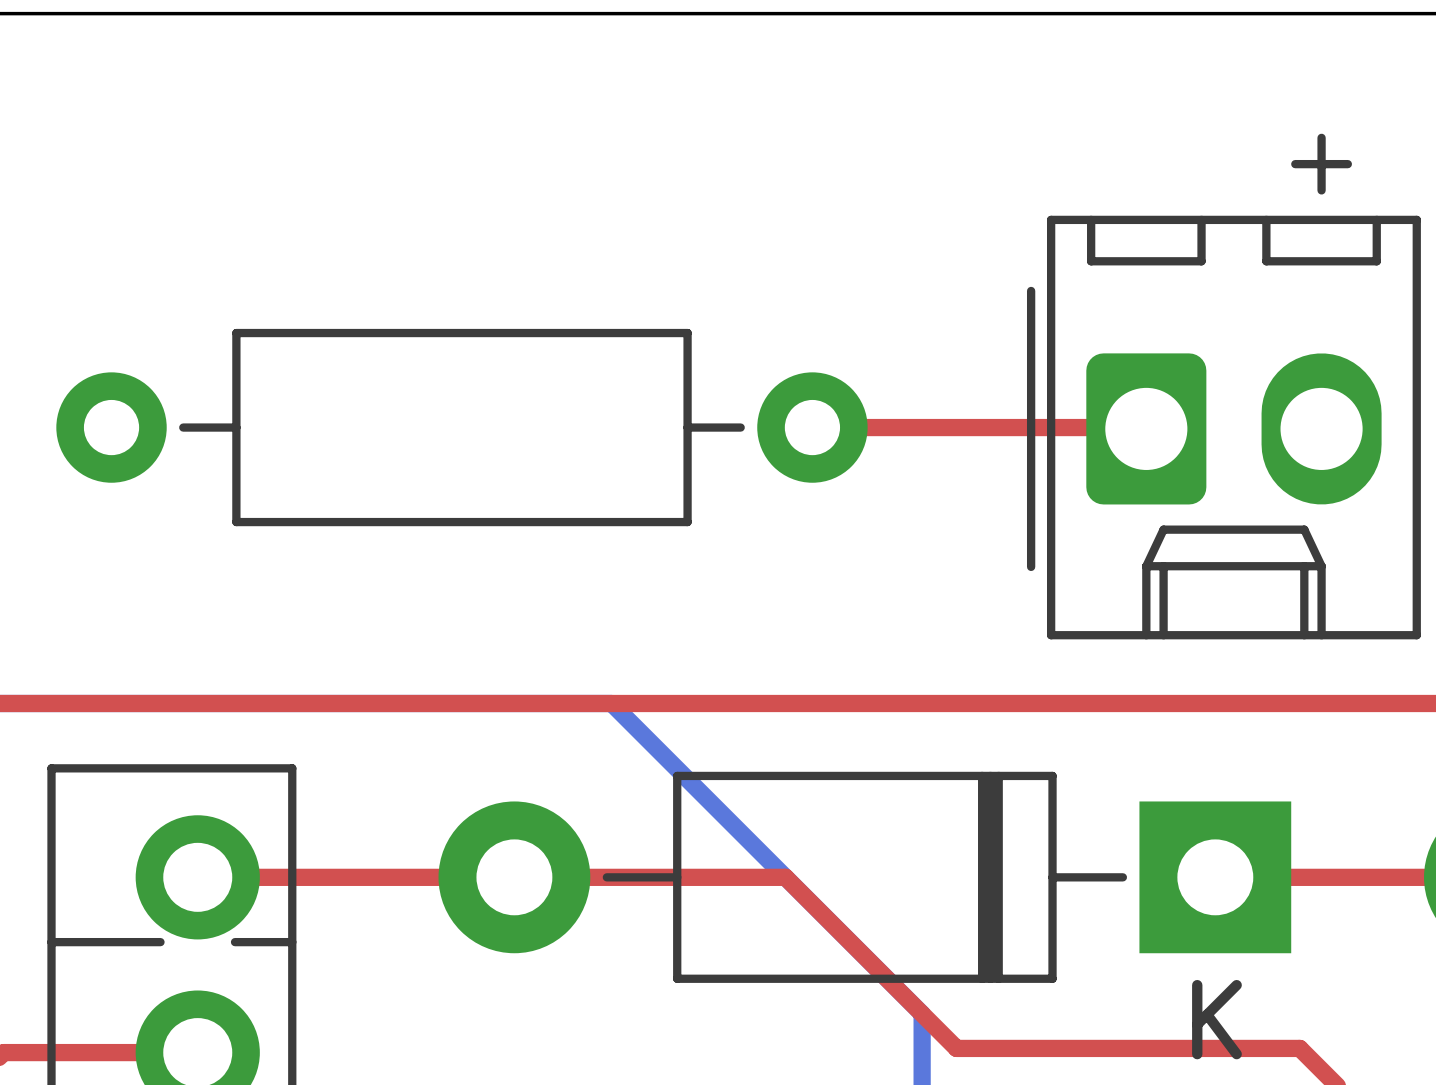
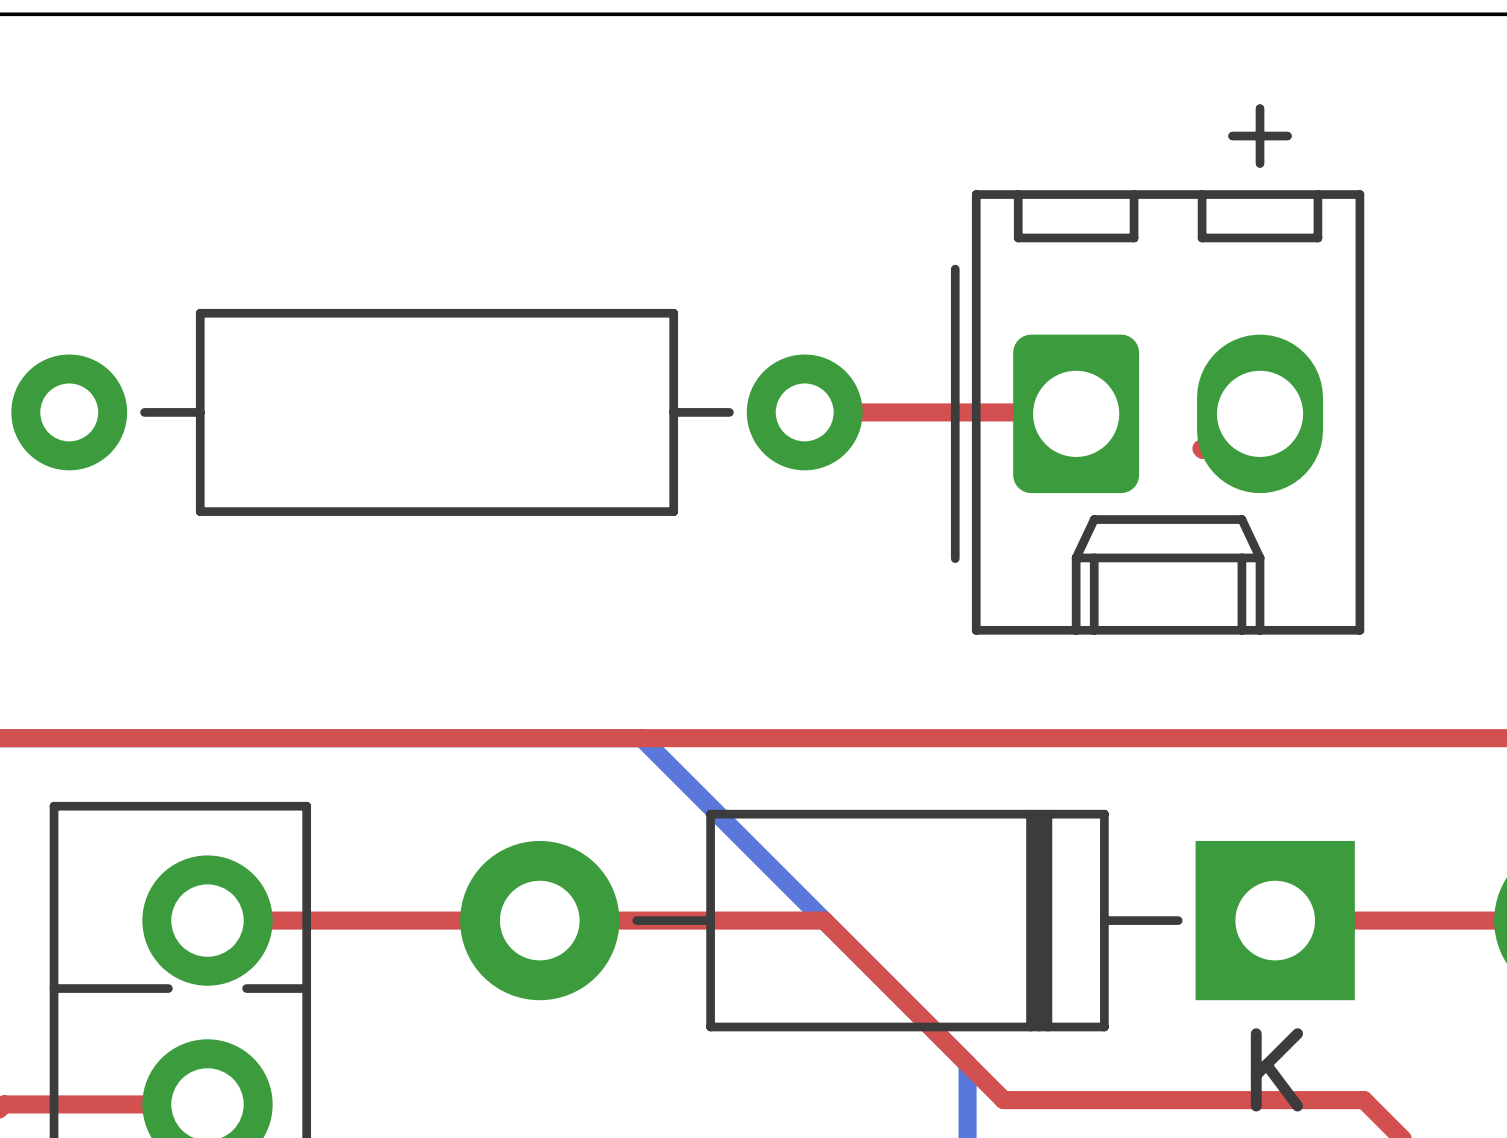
text position: + (1321, 164) -> + (1260, 136)
top track: none -> (804, 412) (1076, 413)
part position: (461, 427) -> (436, 412)
top track: (812, 427) (1144, 427) -> none
part position: (1223, 427) -> (1157, 412)

